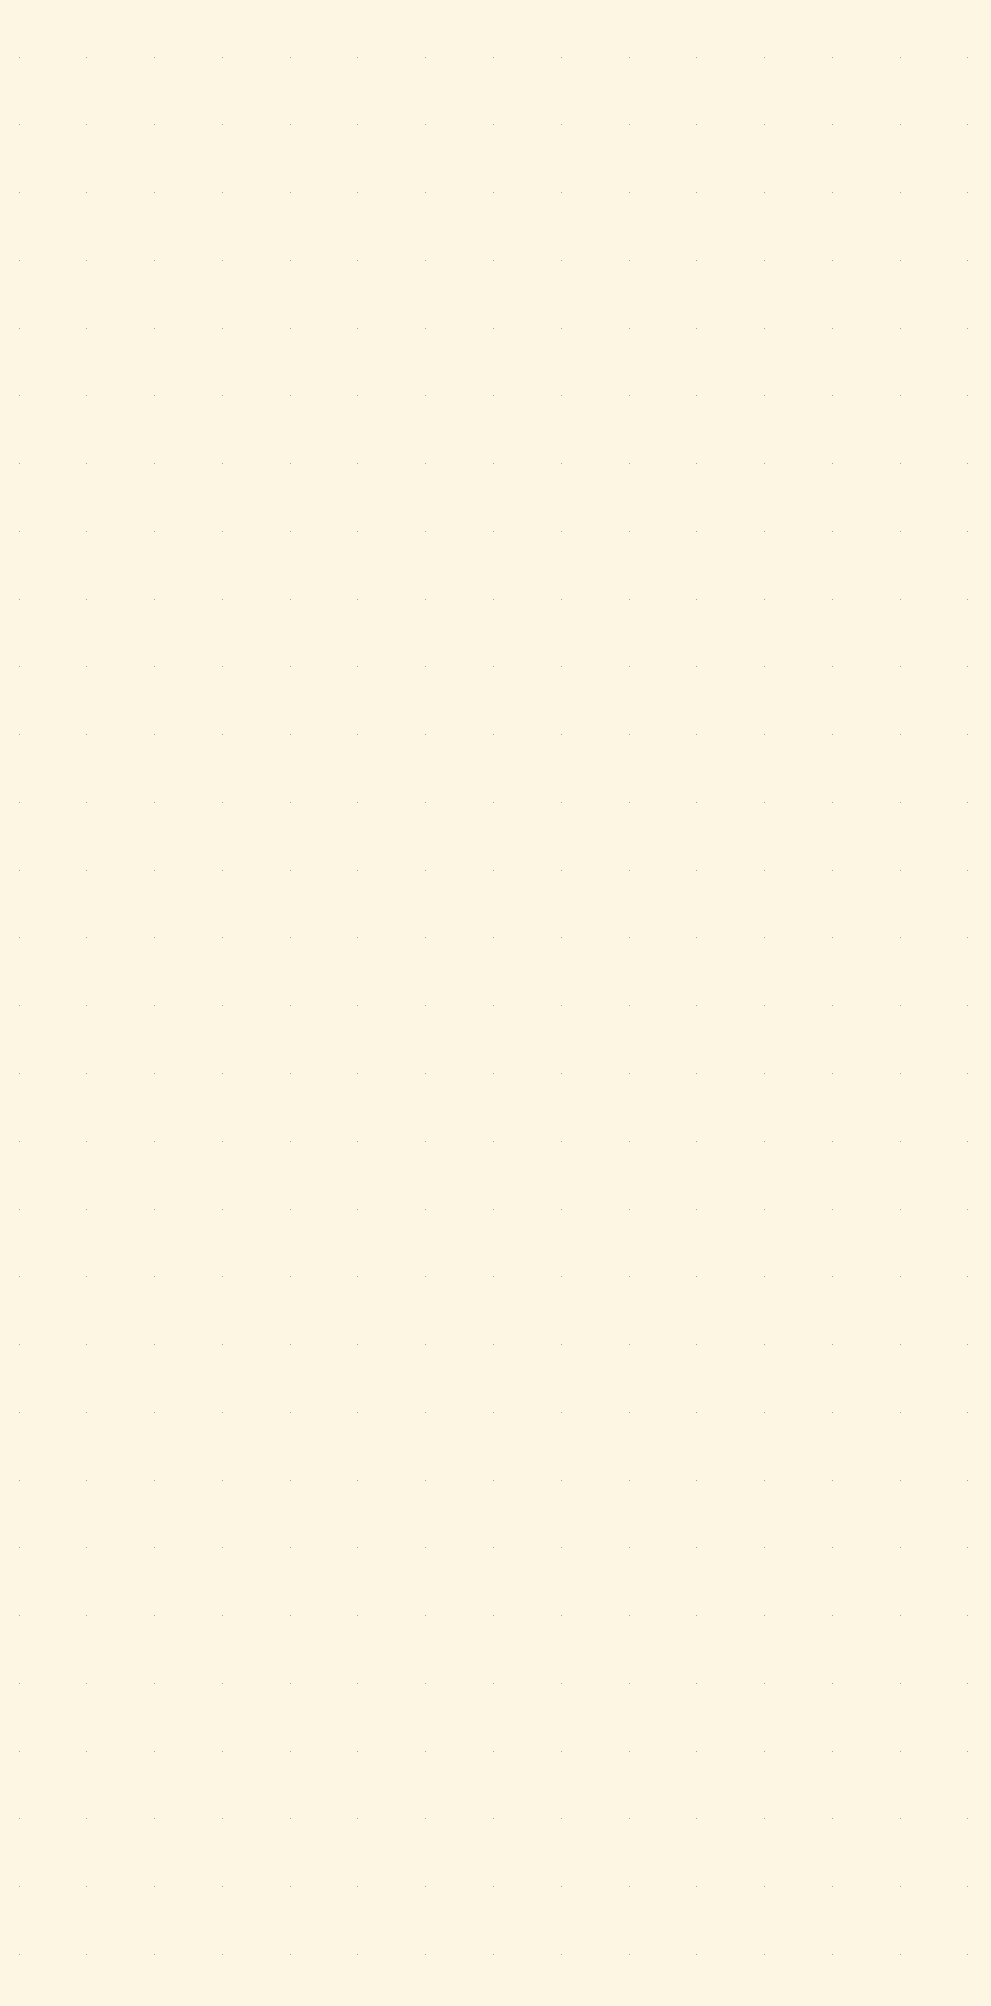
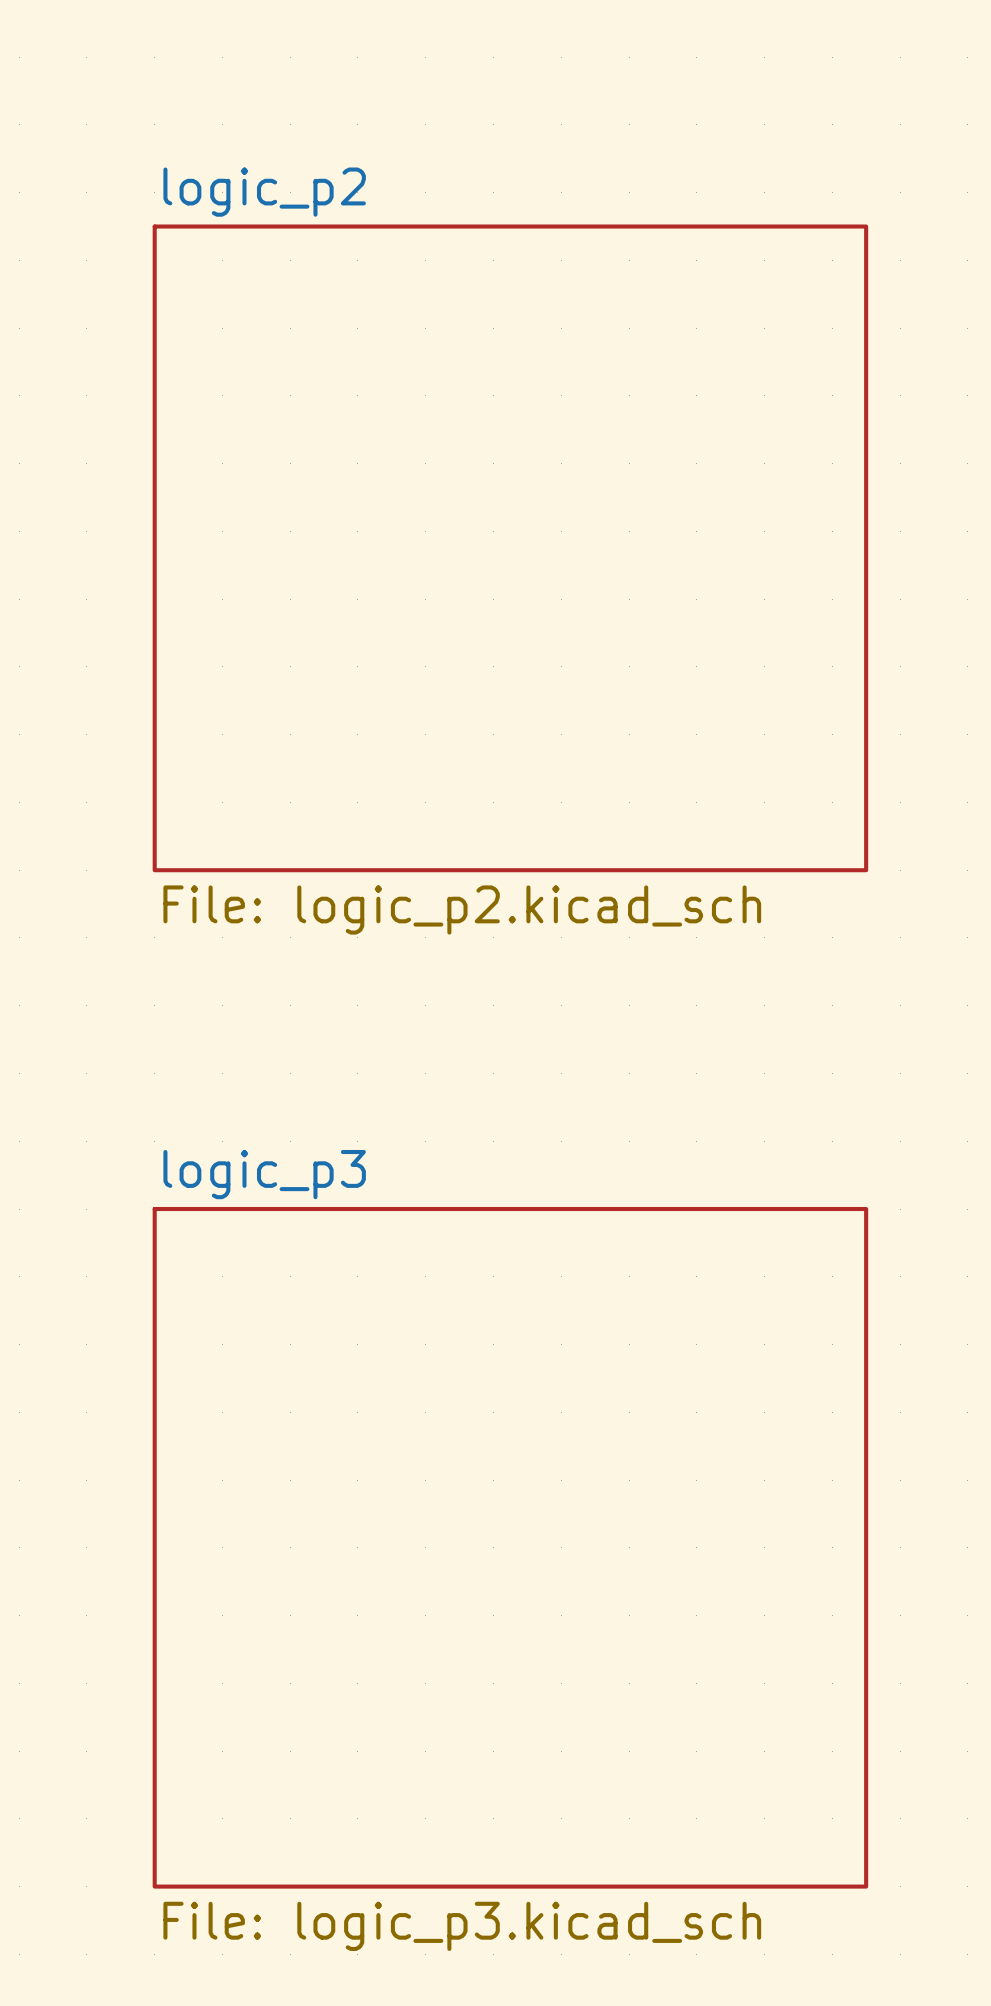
sheet logic_p2: none -> File: logic_p2.kicad_sch (510, 548)
sheet logic_p3: none -> File: logic_p3.kicad_sch (510, 1547)

